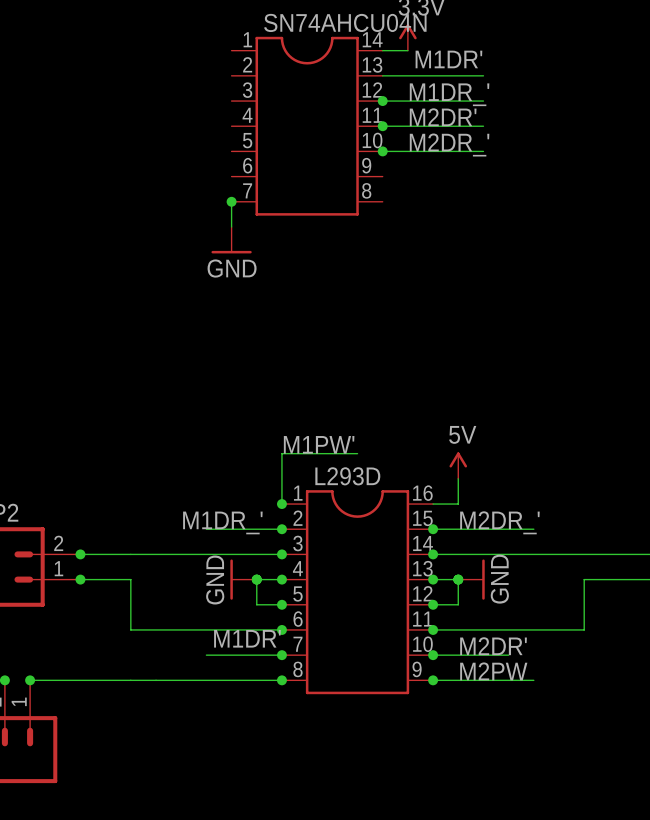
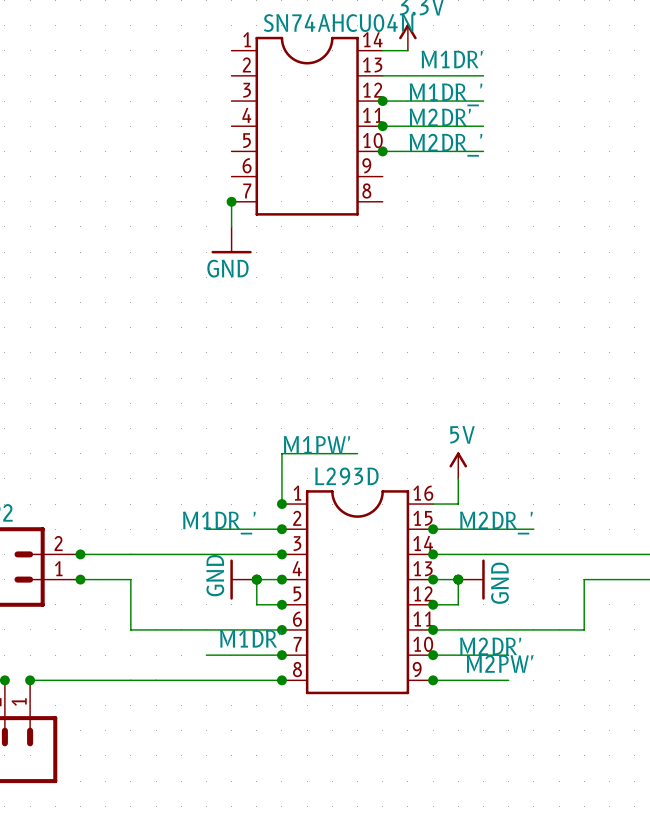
text: M2PW (493, 671) -> M2PW' (499, 663)
wire: (508, 680) (533, 680) -> none

